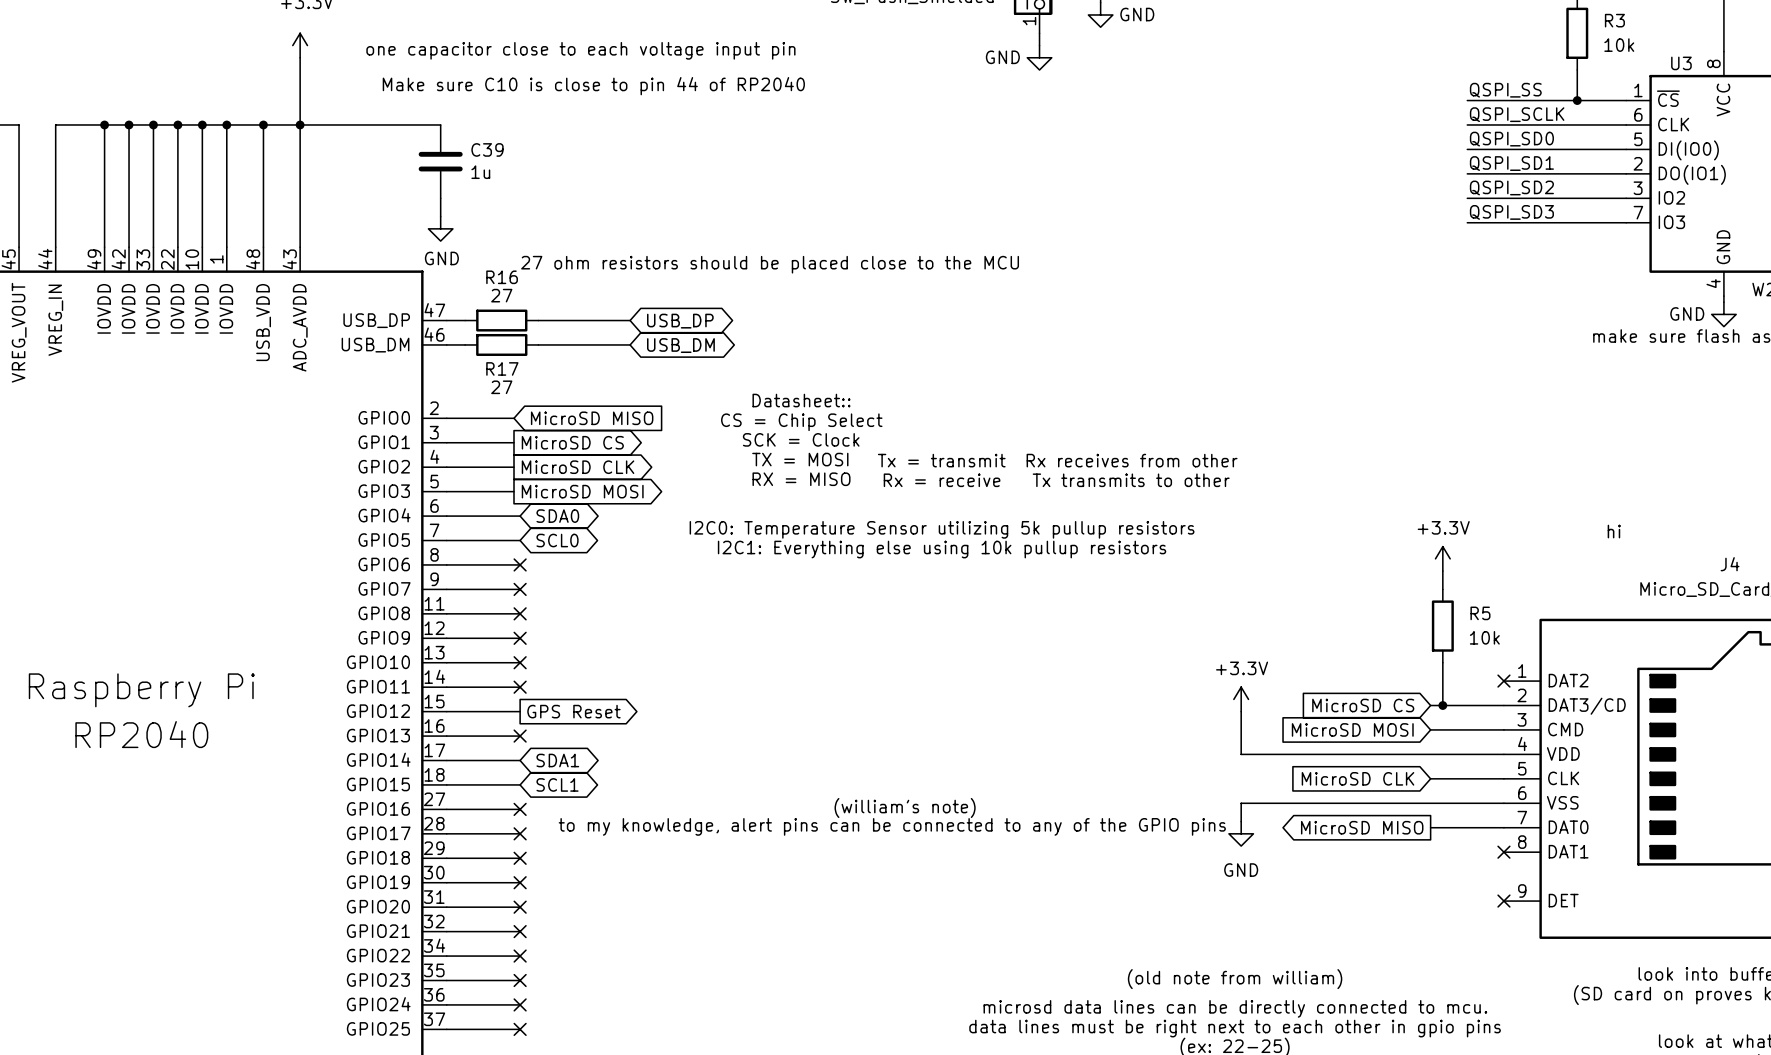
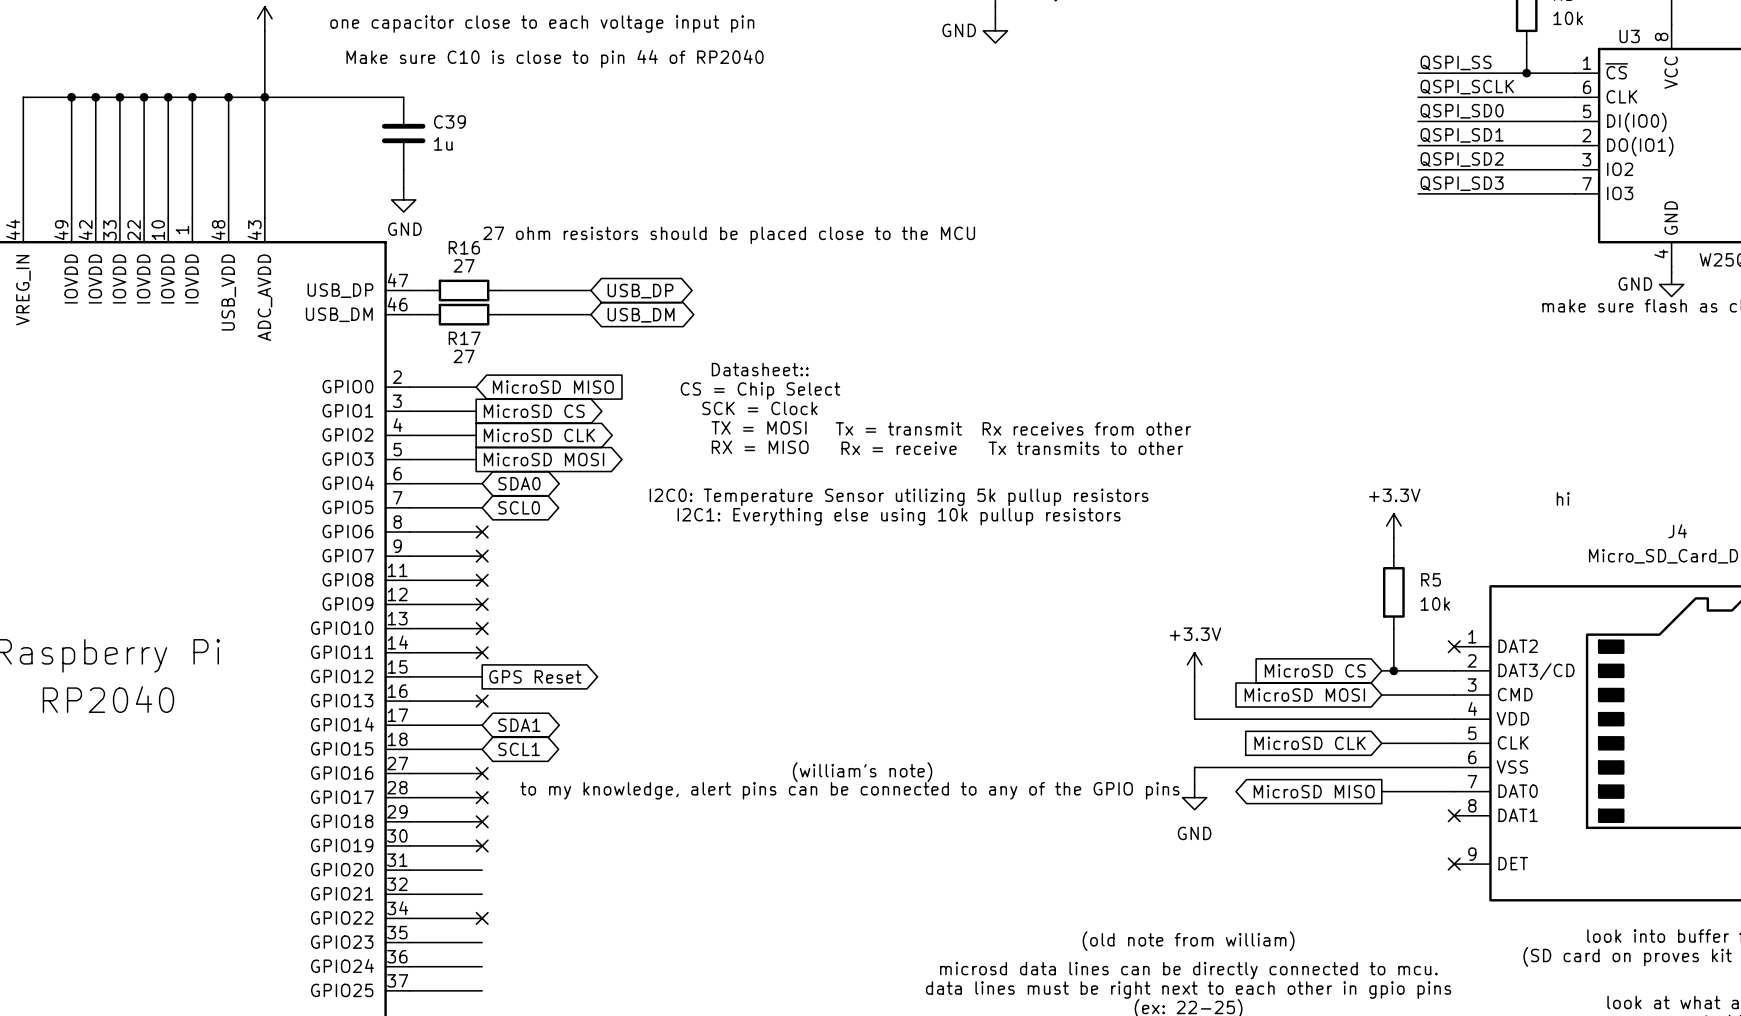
no-connect mark: (520, 907) -> none
no-connect mark: (520, 931) -> none
no-connect mark: (520, 980) -> none
no-connect mark: (520, 1004) -> none
no-connect mark: (520, 1029) -> none

